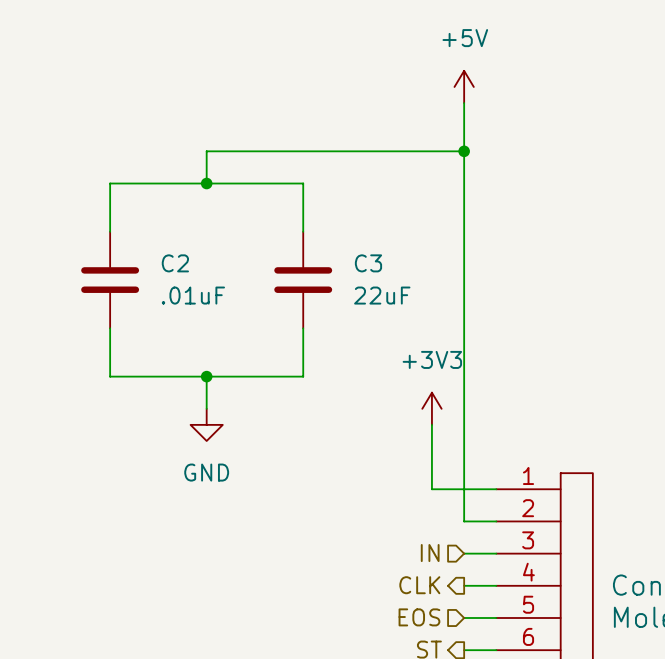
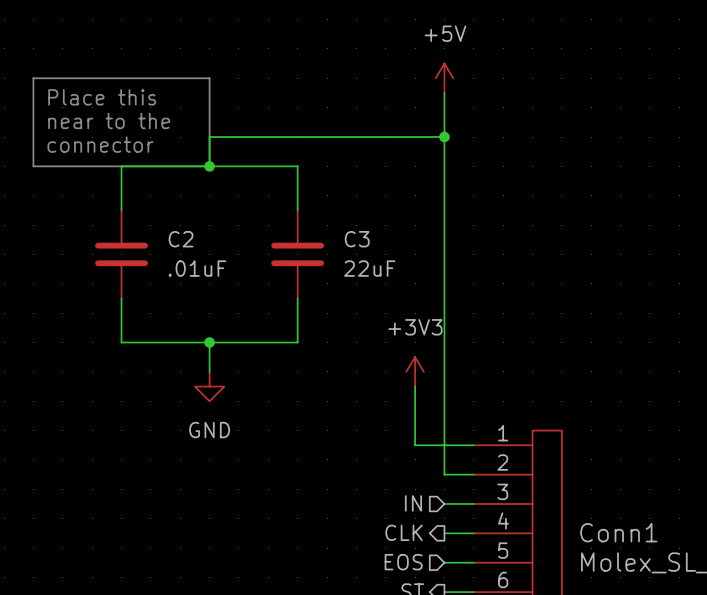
line: none -> (33, 78) (209, 78) (209, 166) (33, 166) (33, 78)
text: none -> Place this (102, 97)
text: none -> near to the (109, 120)
text: none -> connector (100, 144)

